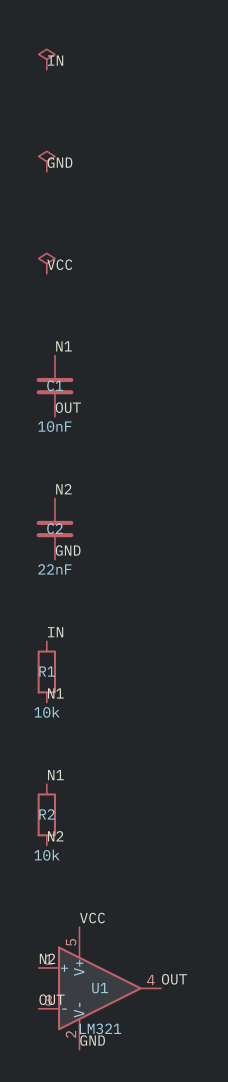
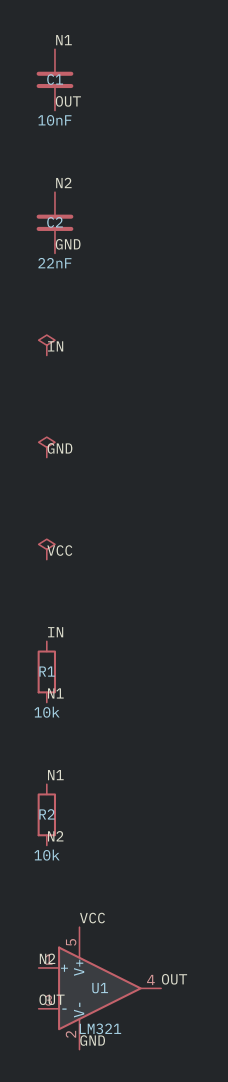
label: none -> N1 (64, 40)
power symbol: (46, 59) -> none
label: IN (55, 60) -> none
label: none -> OUT (68, 101)
power symbol: (46, 161) -> none
label position: GND (59, 162) -> GND (68, 244)
label: none -> N2 (63, 182)
power symbol position: (46, 263) -> (46, 345)
label: VCC (59, 264) -> none
label: none -> IN (55, 346)
label: N1 (64, 346) -> none
C1 position: (54, 386) -> (54, 79)
label: OUT (68, 407) -> none
power symbol: none -> (46, 447)
label: N2 (63, 489) -> none
C2 position: (54, 529) -> (54, 222)
power symbol: none -> (46, 549)
label: none -> VCC (59, 550)
label position: GND (68, 550) -> GND (59, 448)

